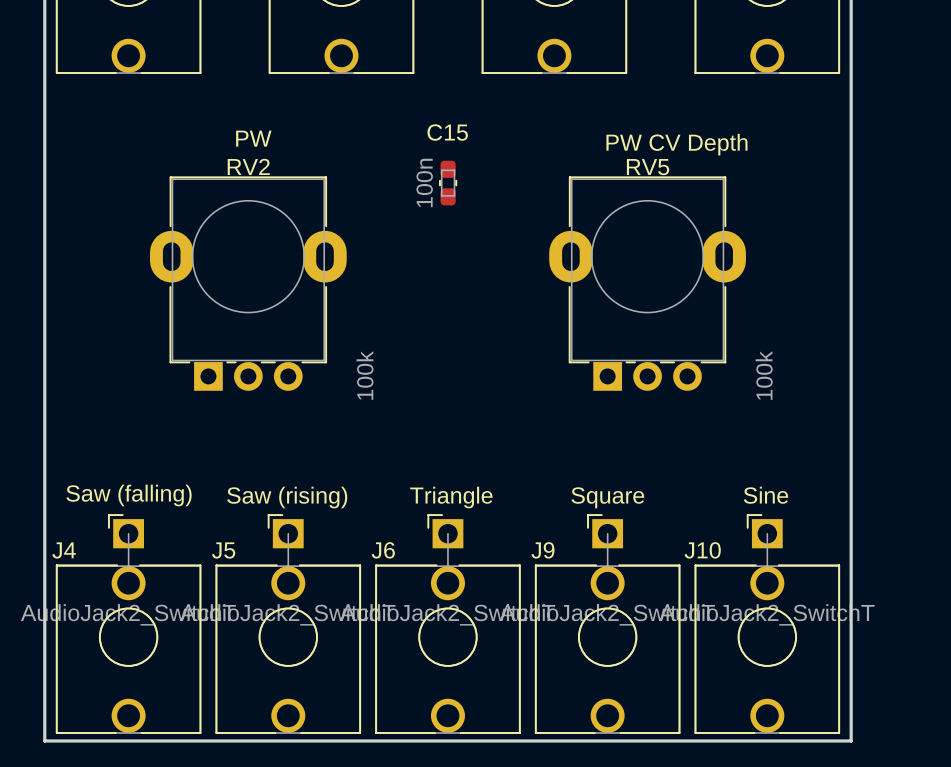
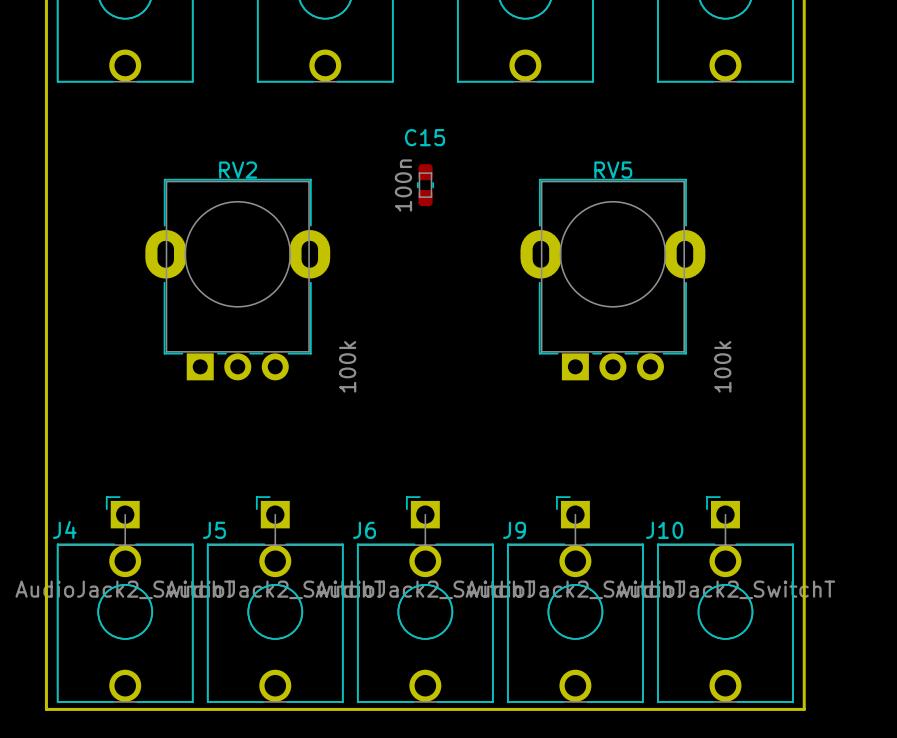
text: PW (253, 138) -> none
text: PW CV Depth (676, 144) -> none
text: Saw (falling) (129, 495) -> none
text: Sine (766, 495) -> none
text: Saw (rising) (287, 497) -> none
text: Triangle (451, 497) -> none
text: Square (607, 497) -> none

